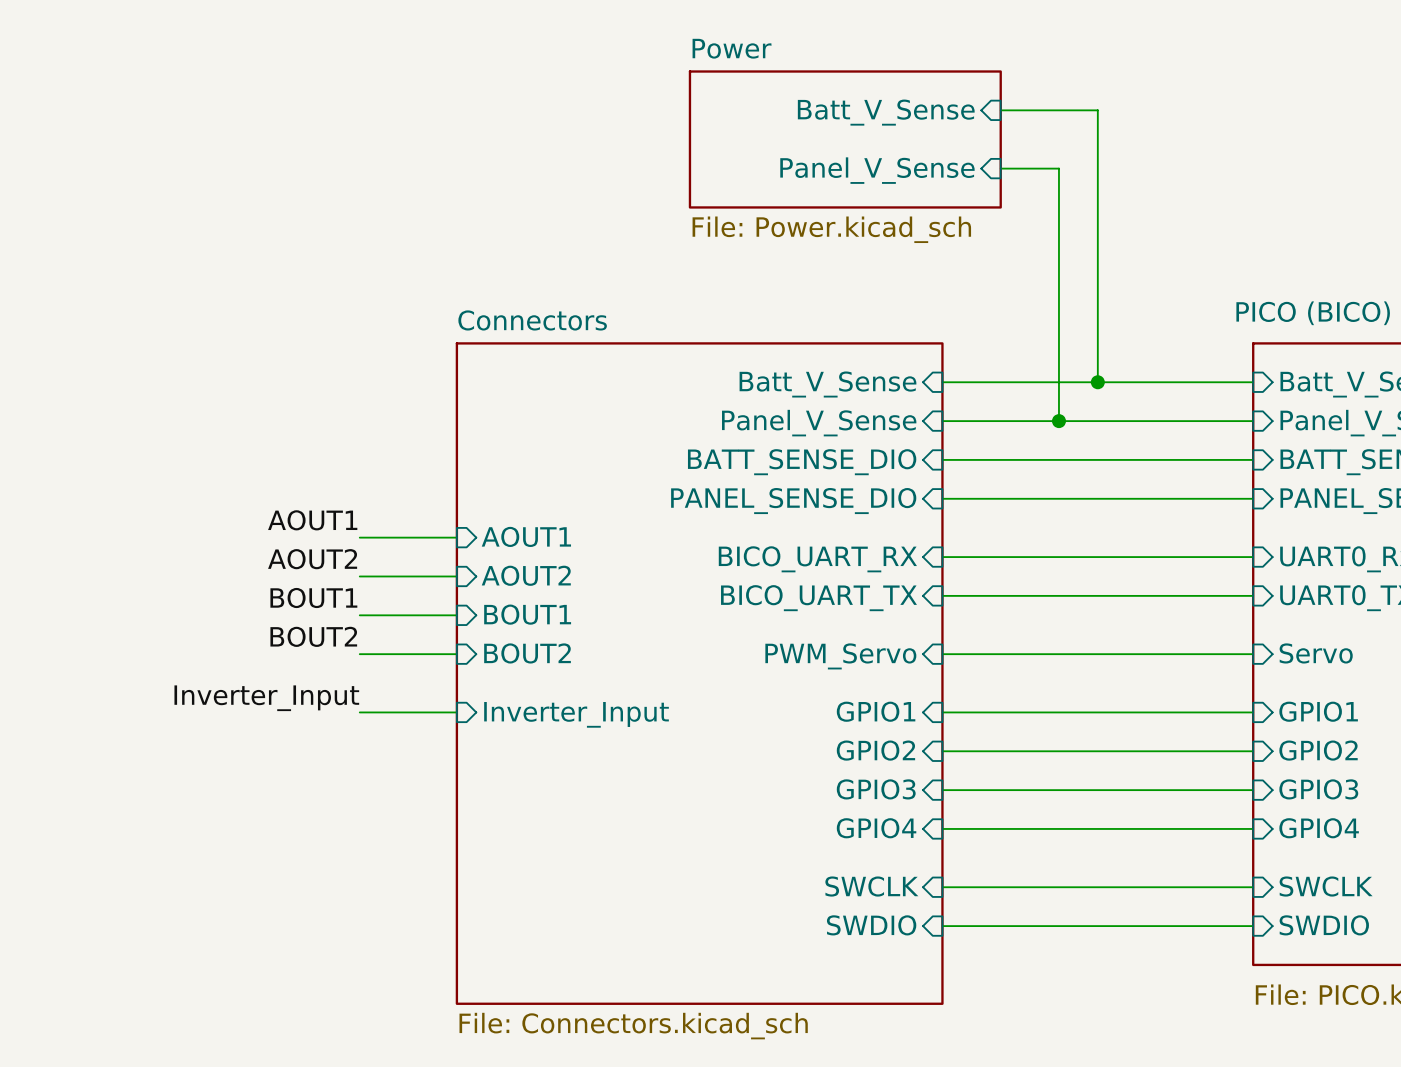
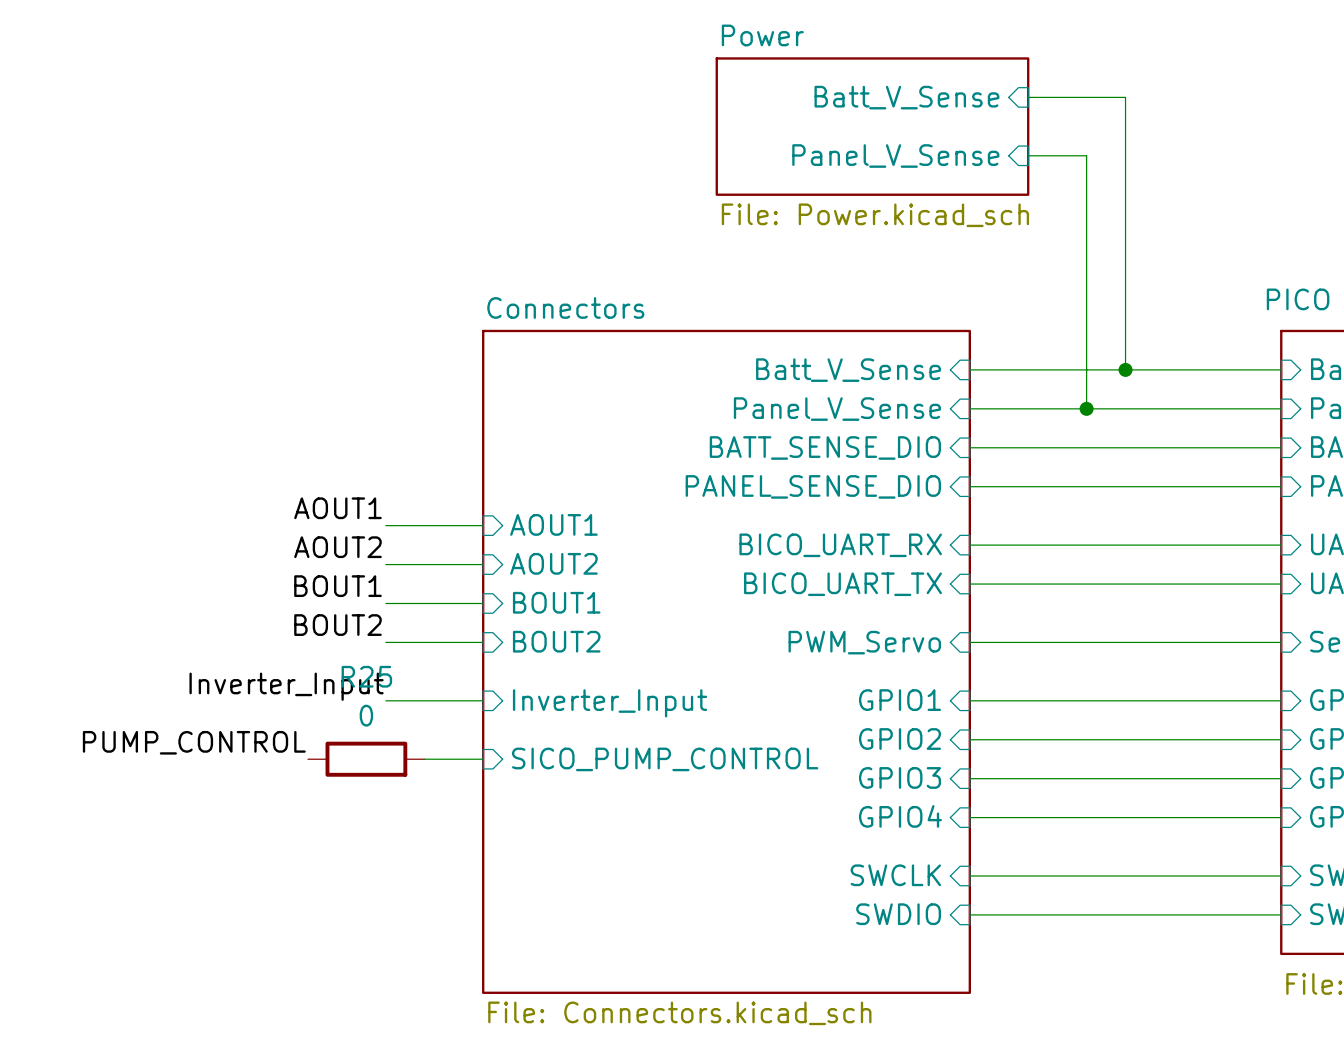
label: none -> PUMP_CONTROL (194, 742)
R25: none -> 0 (366, 759)
wire: none -> (424, 759) (483, 759)
sheet pin: none -> SICO_PUMP_CONTROL (665, 759)

